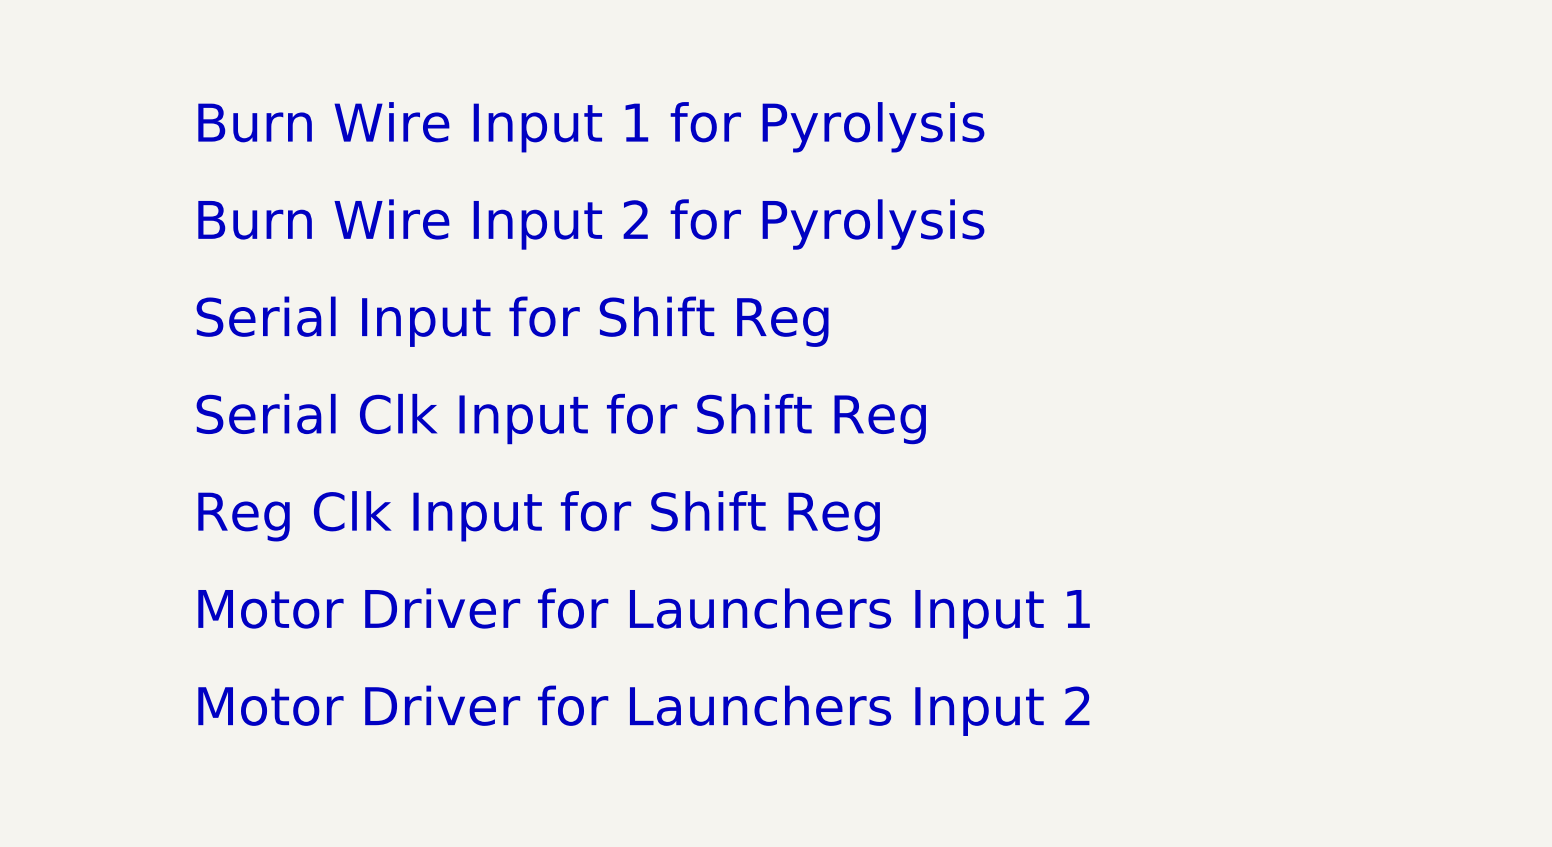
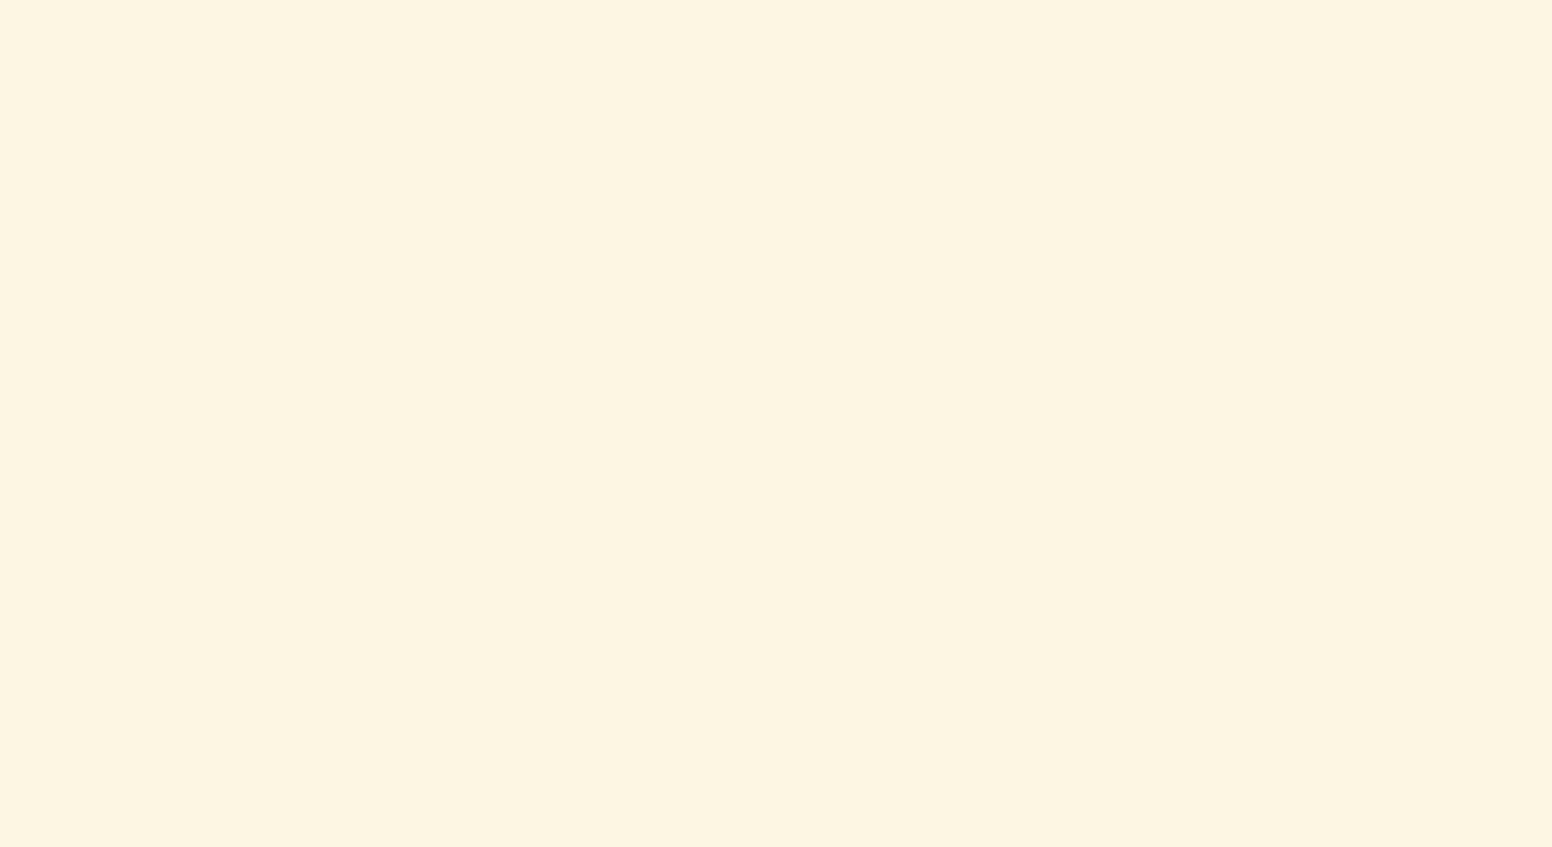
text: Burn Wire Input 1 for Pyrolysis (591, 127) -> none
text: Burn Wire Input 2 for Pyrolysis (591, 224) -> none
text: Serial Input for Shift Reg (512, 321) -> none
text: Serial Clk Input for Shift Reg (561, 419) -> none
text: Reg Clk Input for Shift Reg (539, 516) -> none
text: Motor Driver for Launchers Input 1 (644, 613) -> none
text: Motor Driver for Launchers Input 2 (643, 710) -> none

